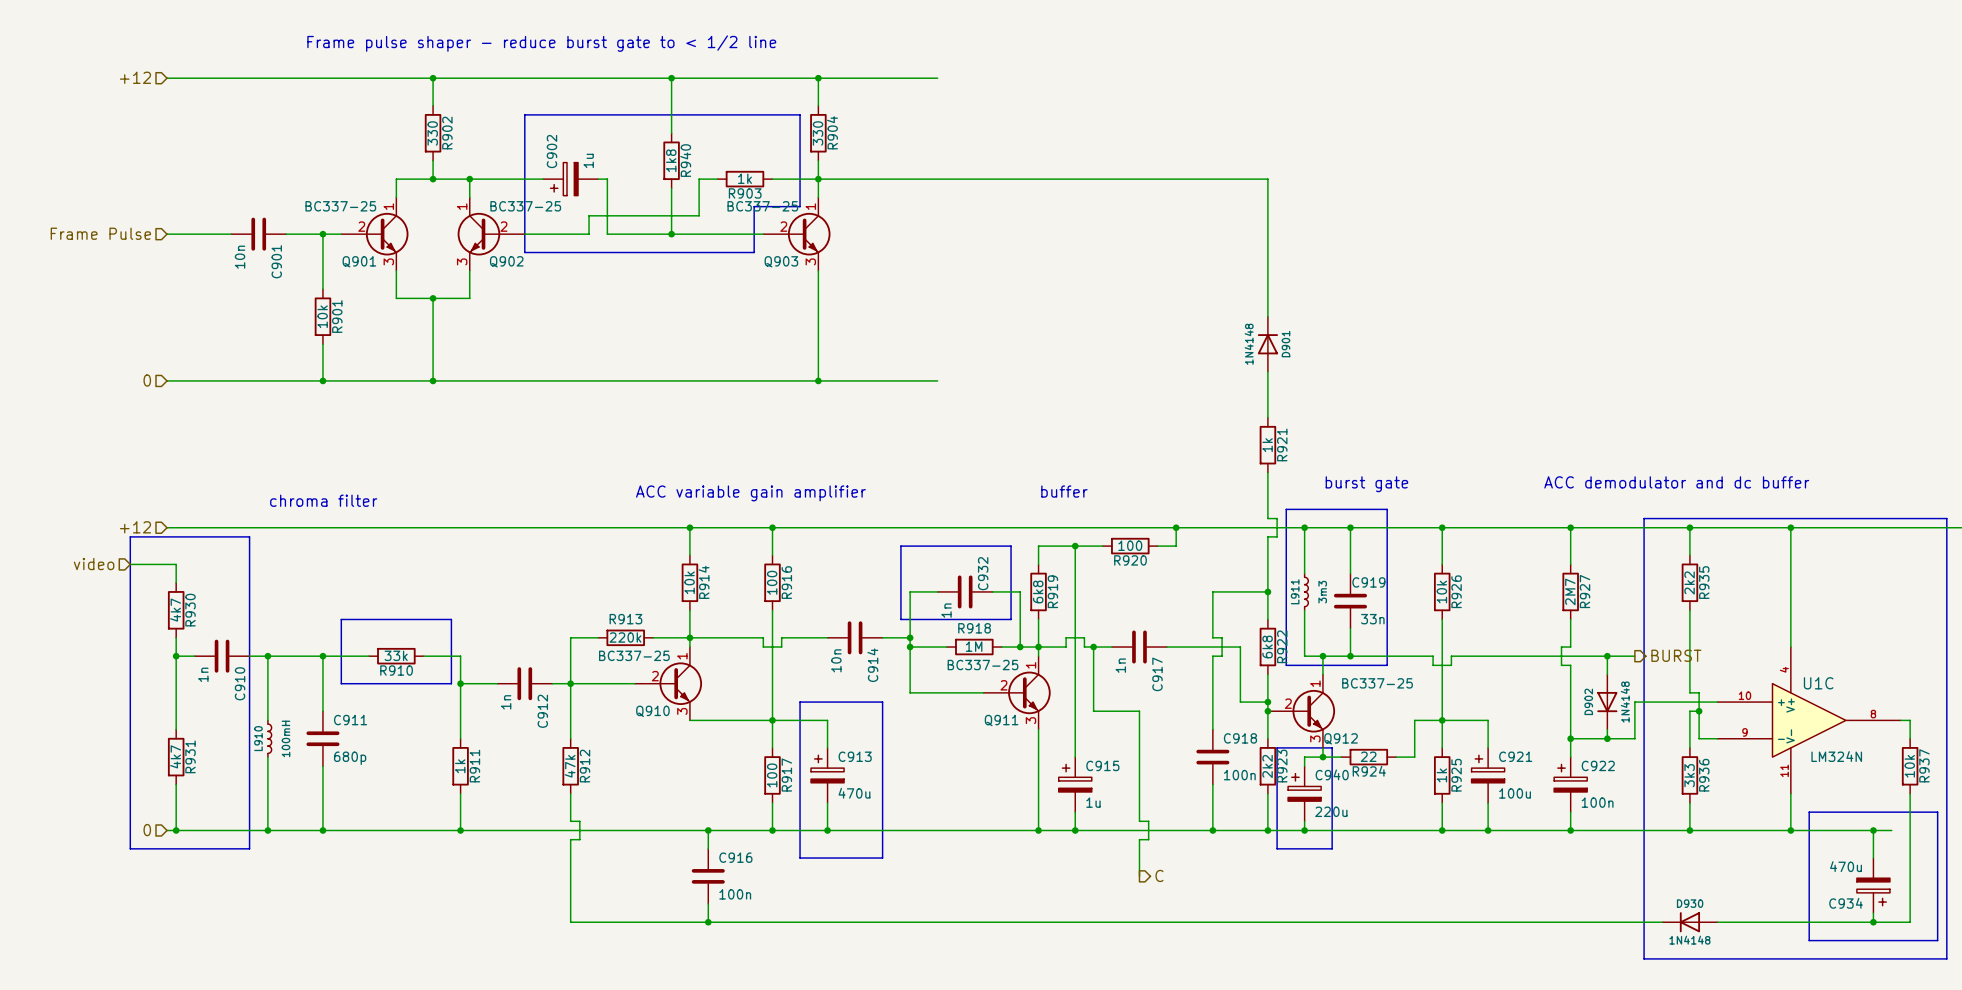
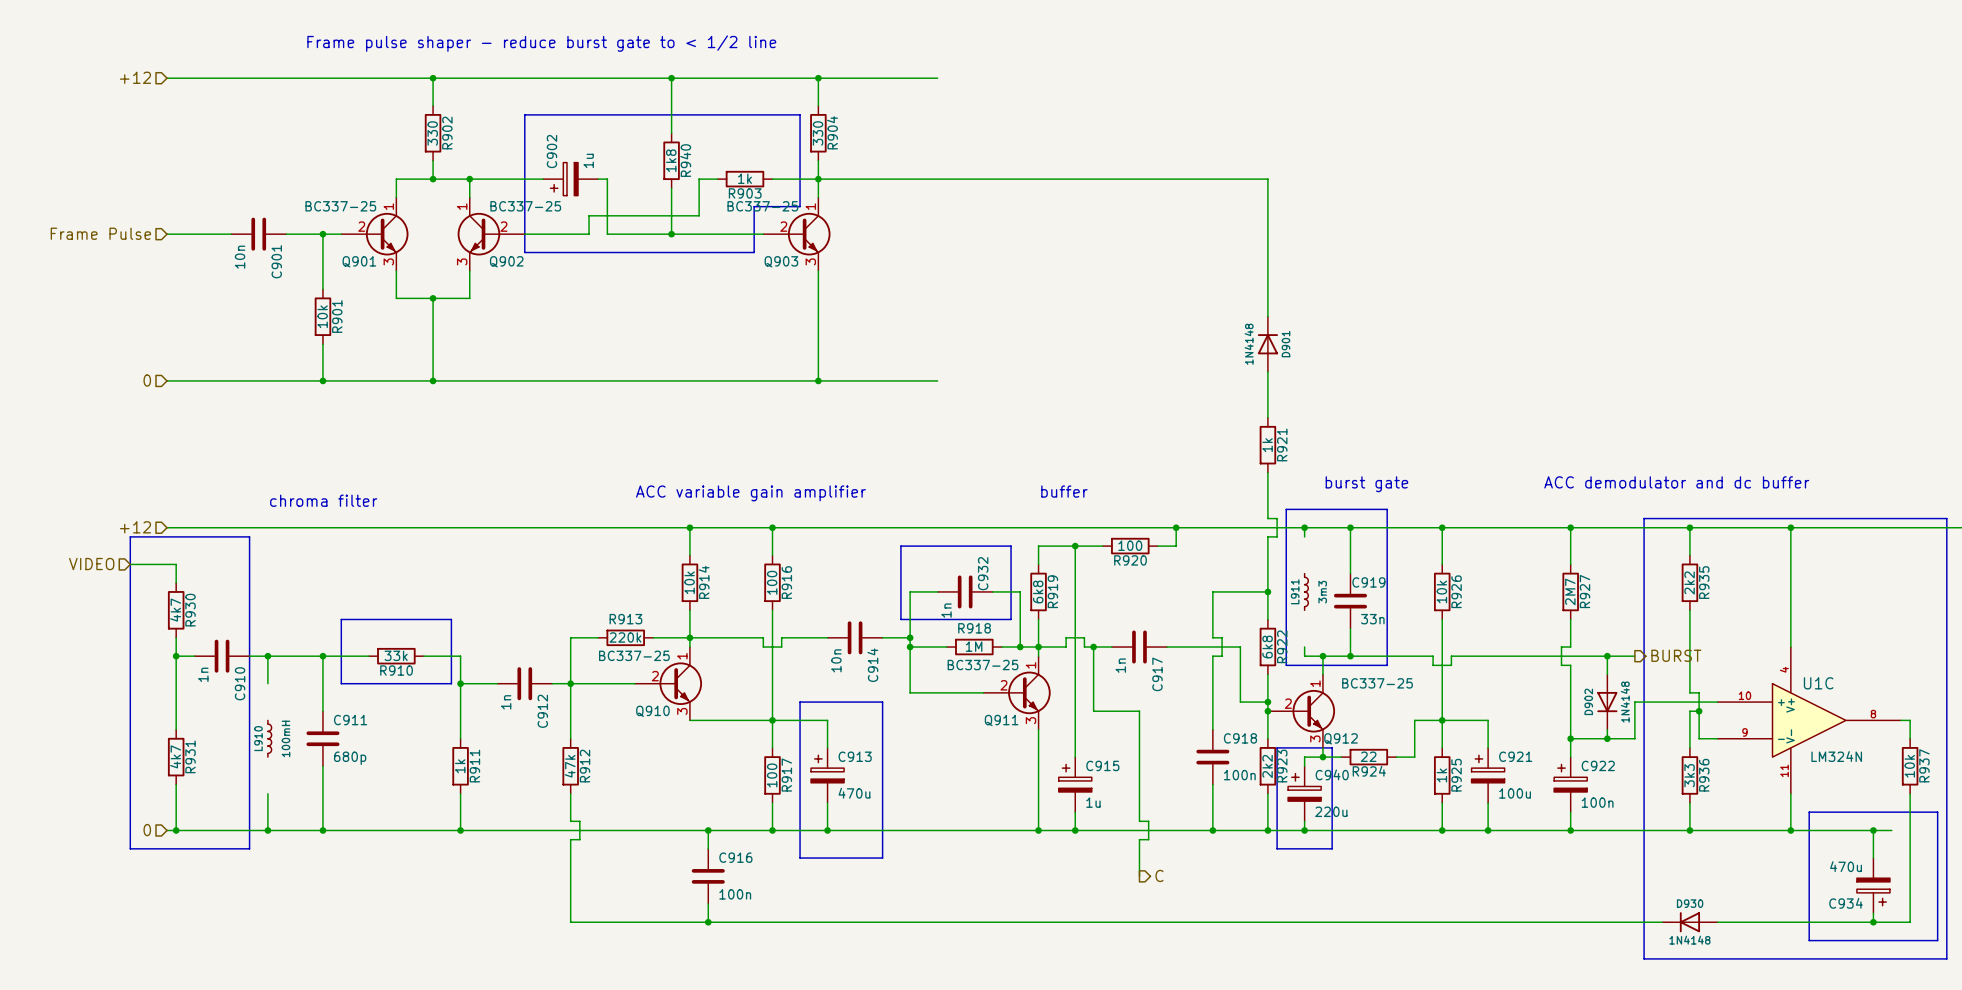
wire: (1304, 536) (1304, 573) -> none
hierarchical label: video (94, 564) -> VIDEO (91, 564)
wire: (1304, 610) (1304, 647) -> none
wire: (267, 683) (267, 720) -> none
wire: (267, 757) (267, 793) -> none

